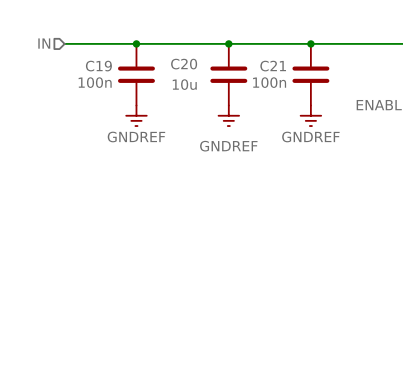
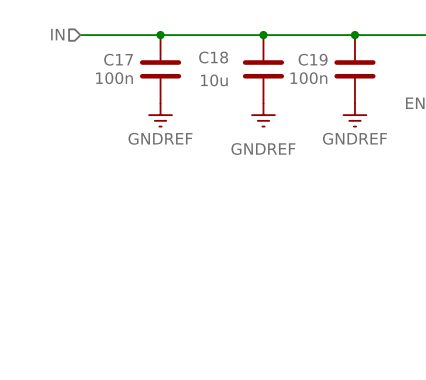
C20 name: C20 (184, 64) -> C18 (213, 57)
C19 name: C19 (98, 66) -> C17 (118, 59)
C21 name: C21 (273, 66) -> C19 (313, 59)

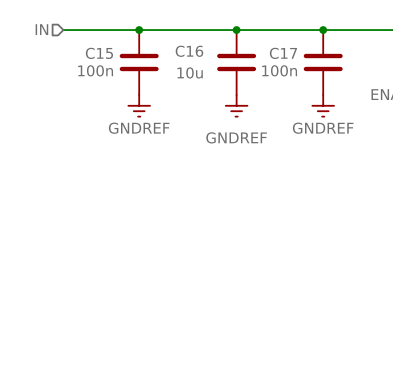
C18 name: C18 (213, 57) -> C16 (189, 51)
C17 name: C17 (118, 59) -> C15 (99, 53)
C19 name: C19 (313, 59) -> C17 (283, 53)

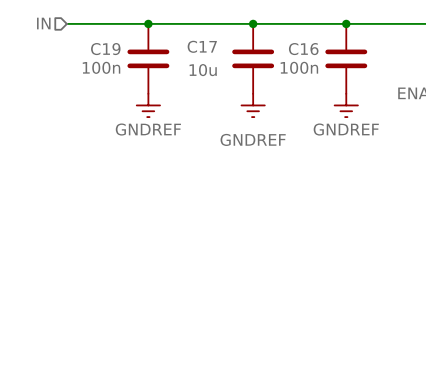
C16 name: C16 (189, 51) -> C17 (202, 46)
C15 name: C15 (99, 53) -> C19 (105, 49)
C17 name: C17 (283, 53) -> C16 (303, 49)

